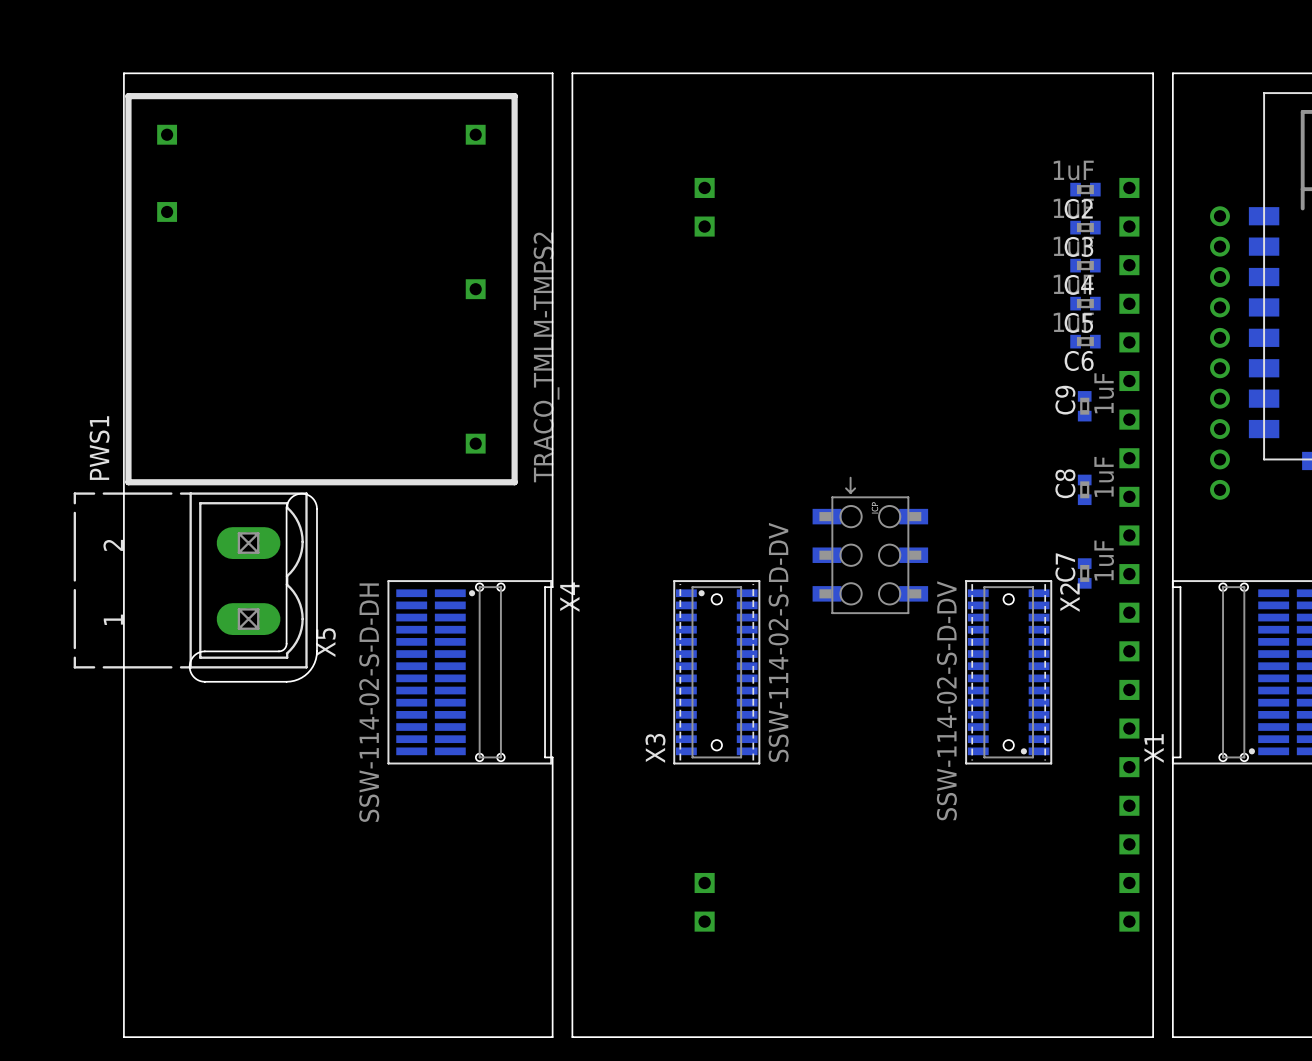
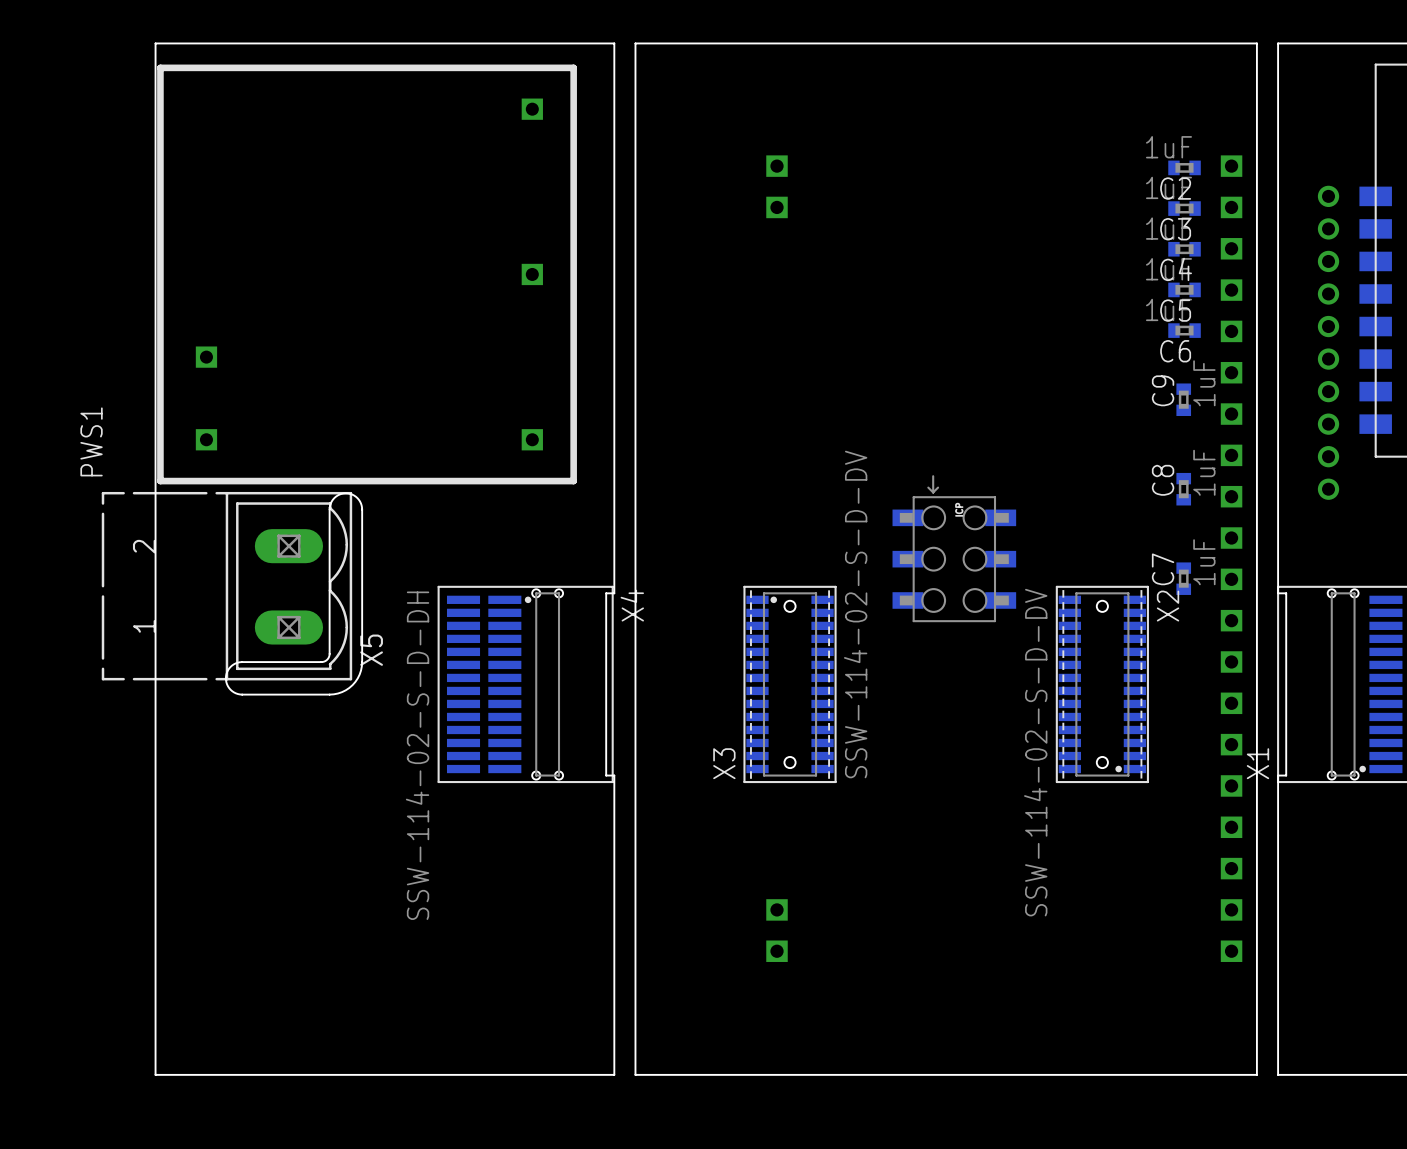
PWS1 footprint: [125, 93, 518, 486] -> [157, 64, 577, 485]
PWS1 value: TRACO_TMLM-TMPS2 (546, 357) -> none
PWS1 name position: PWS1 (99, 448) -> PWS1 (91, 441)

